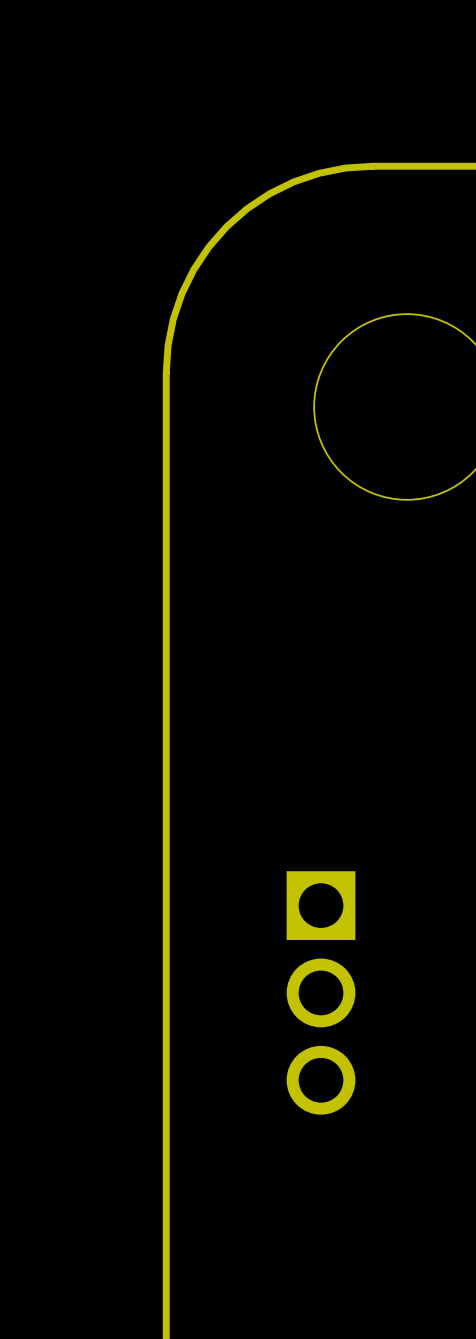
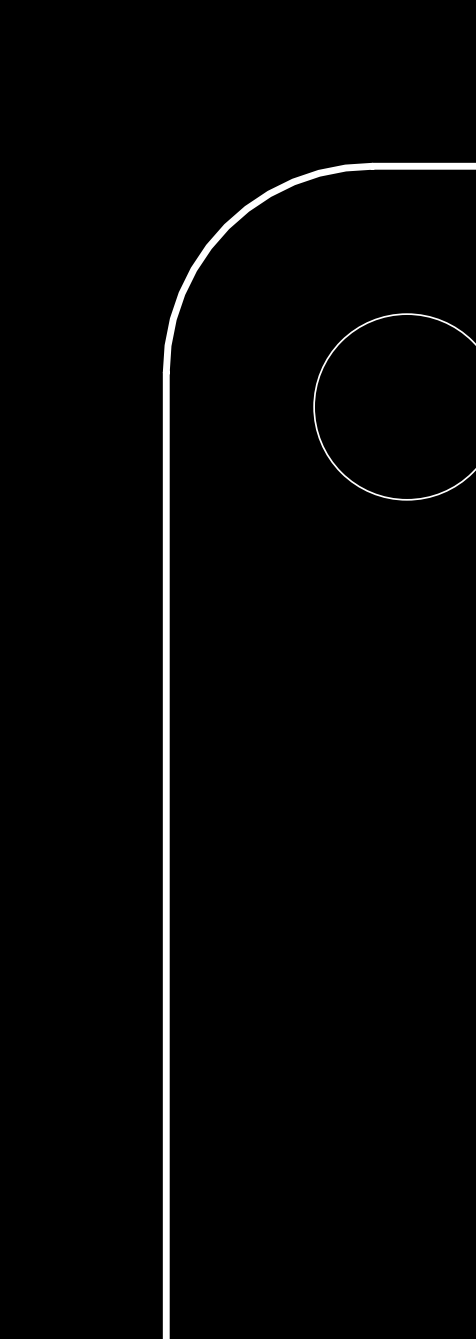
part: (321, 992) -> none

